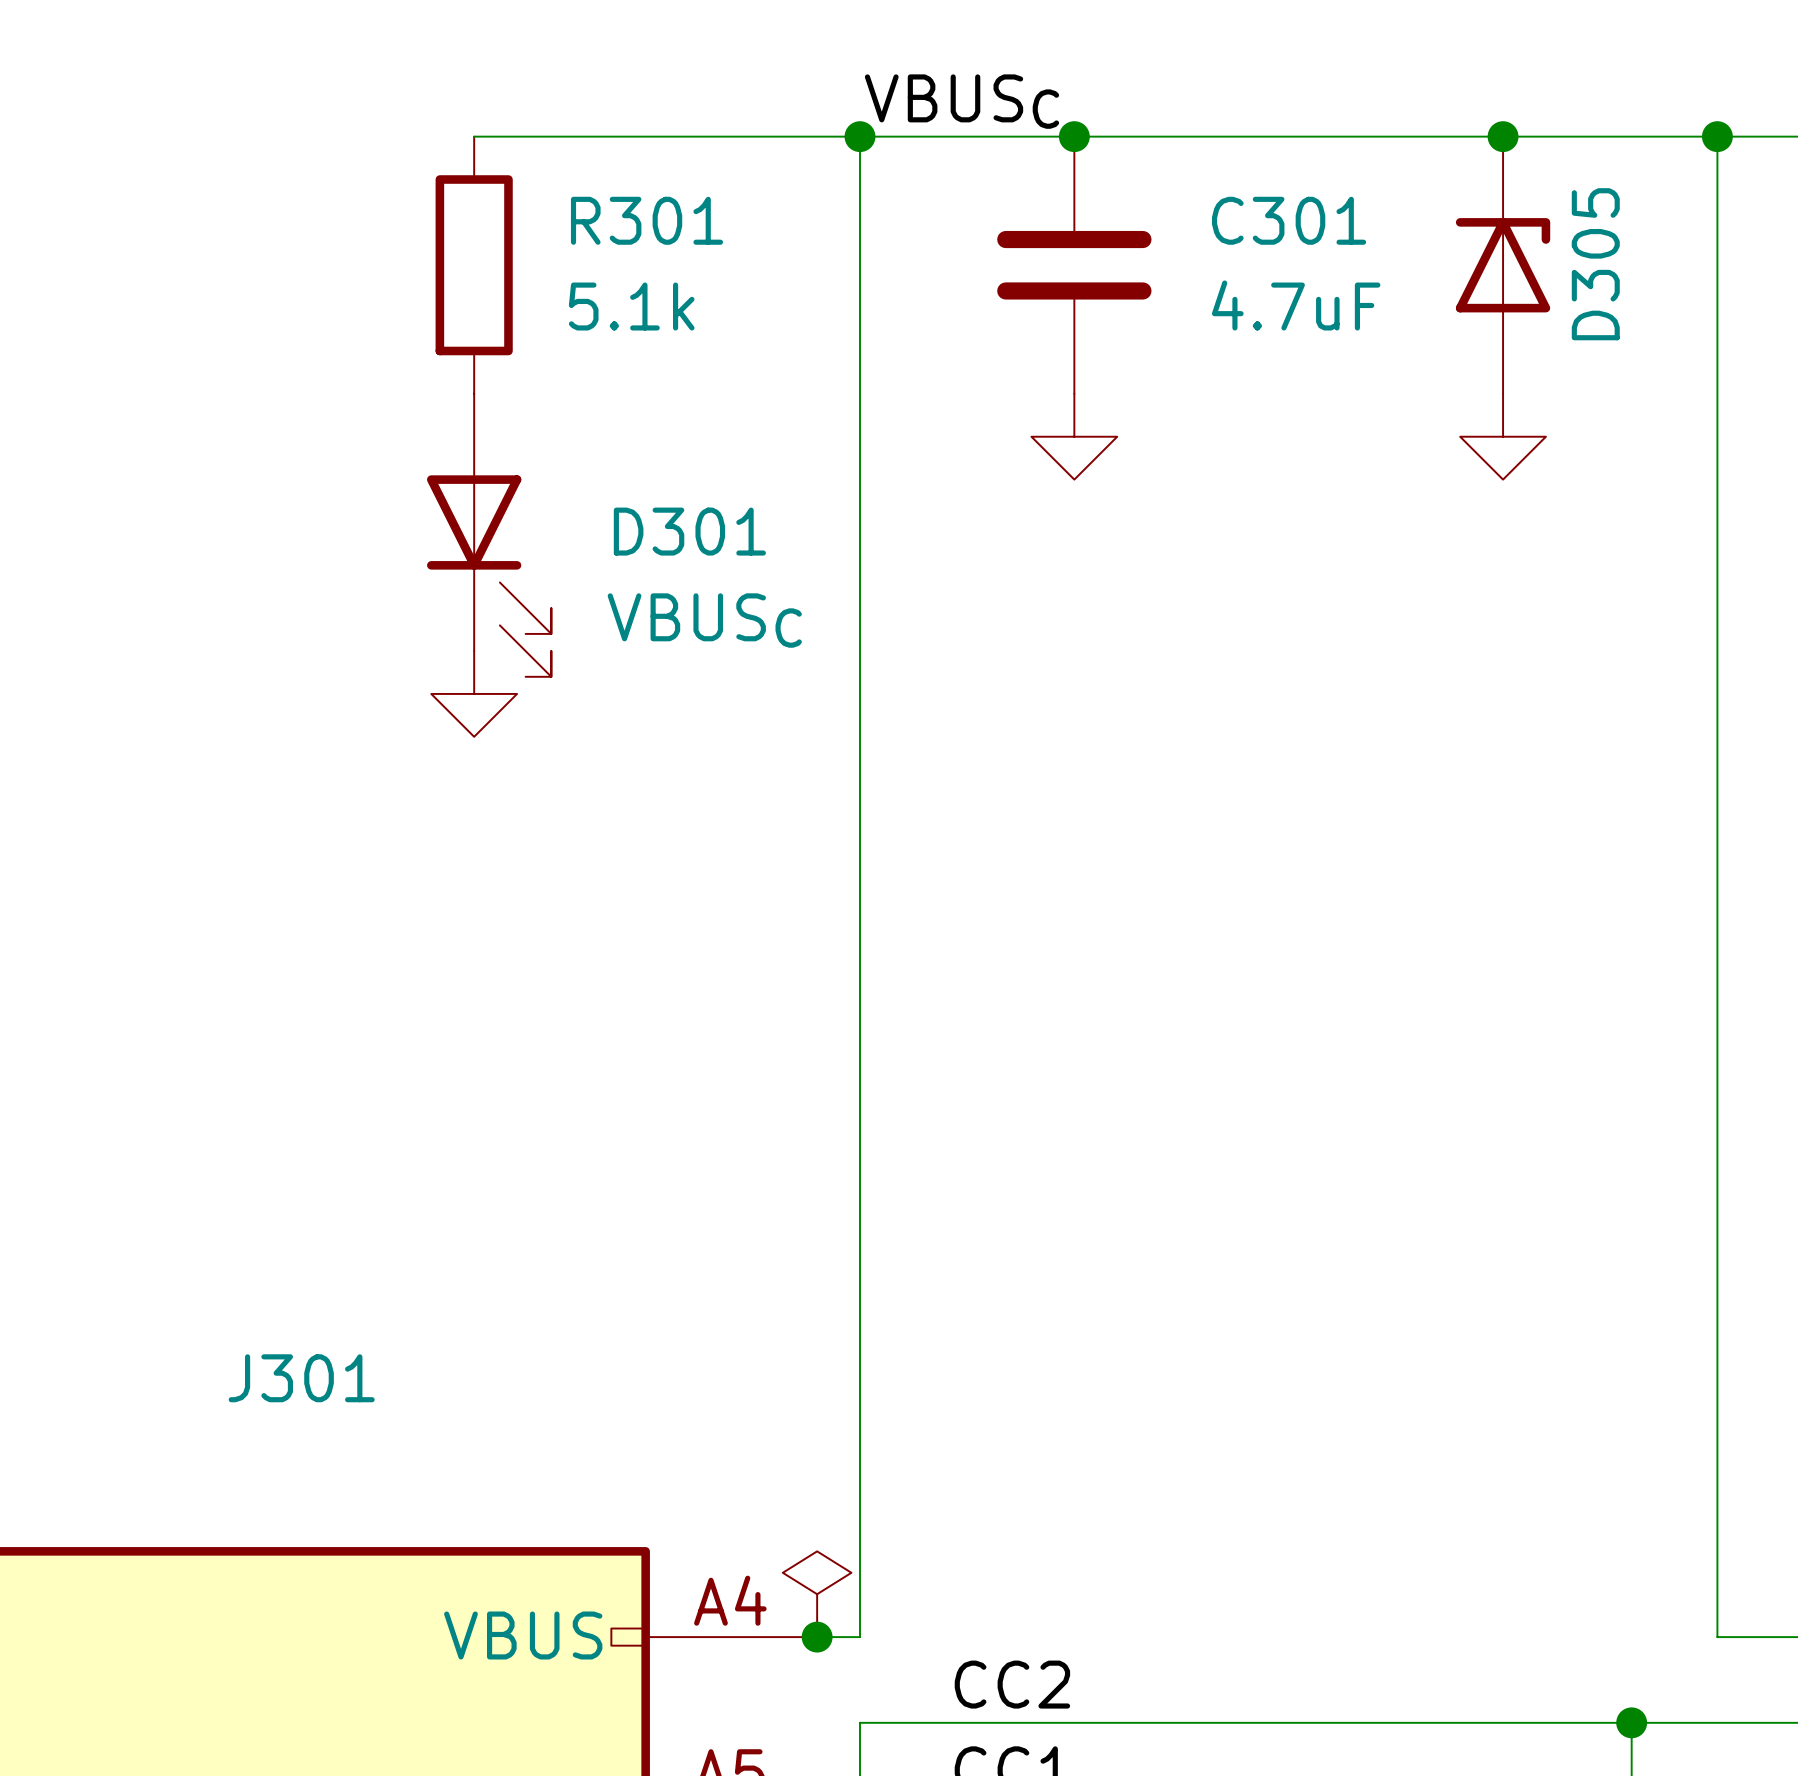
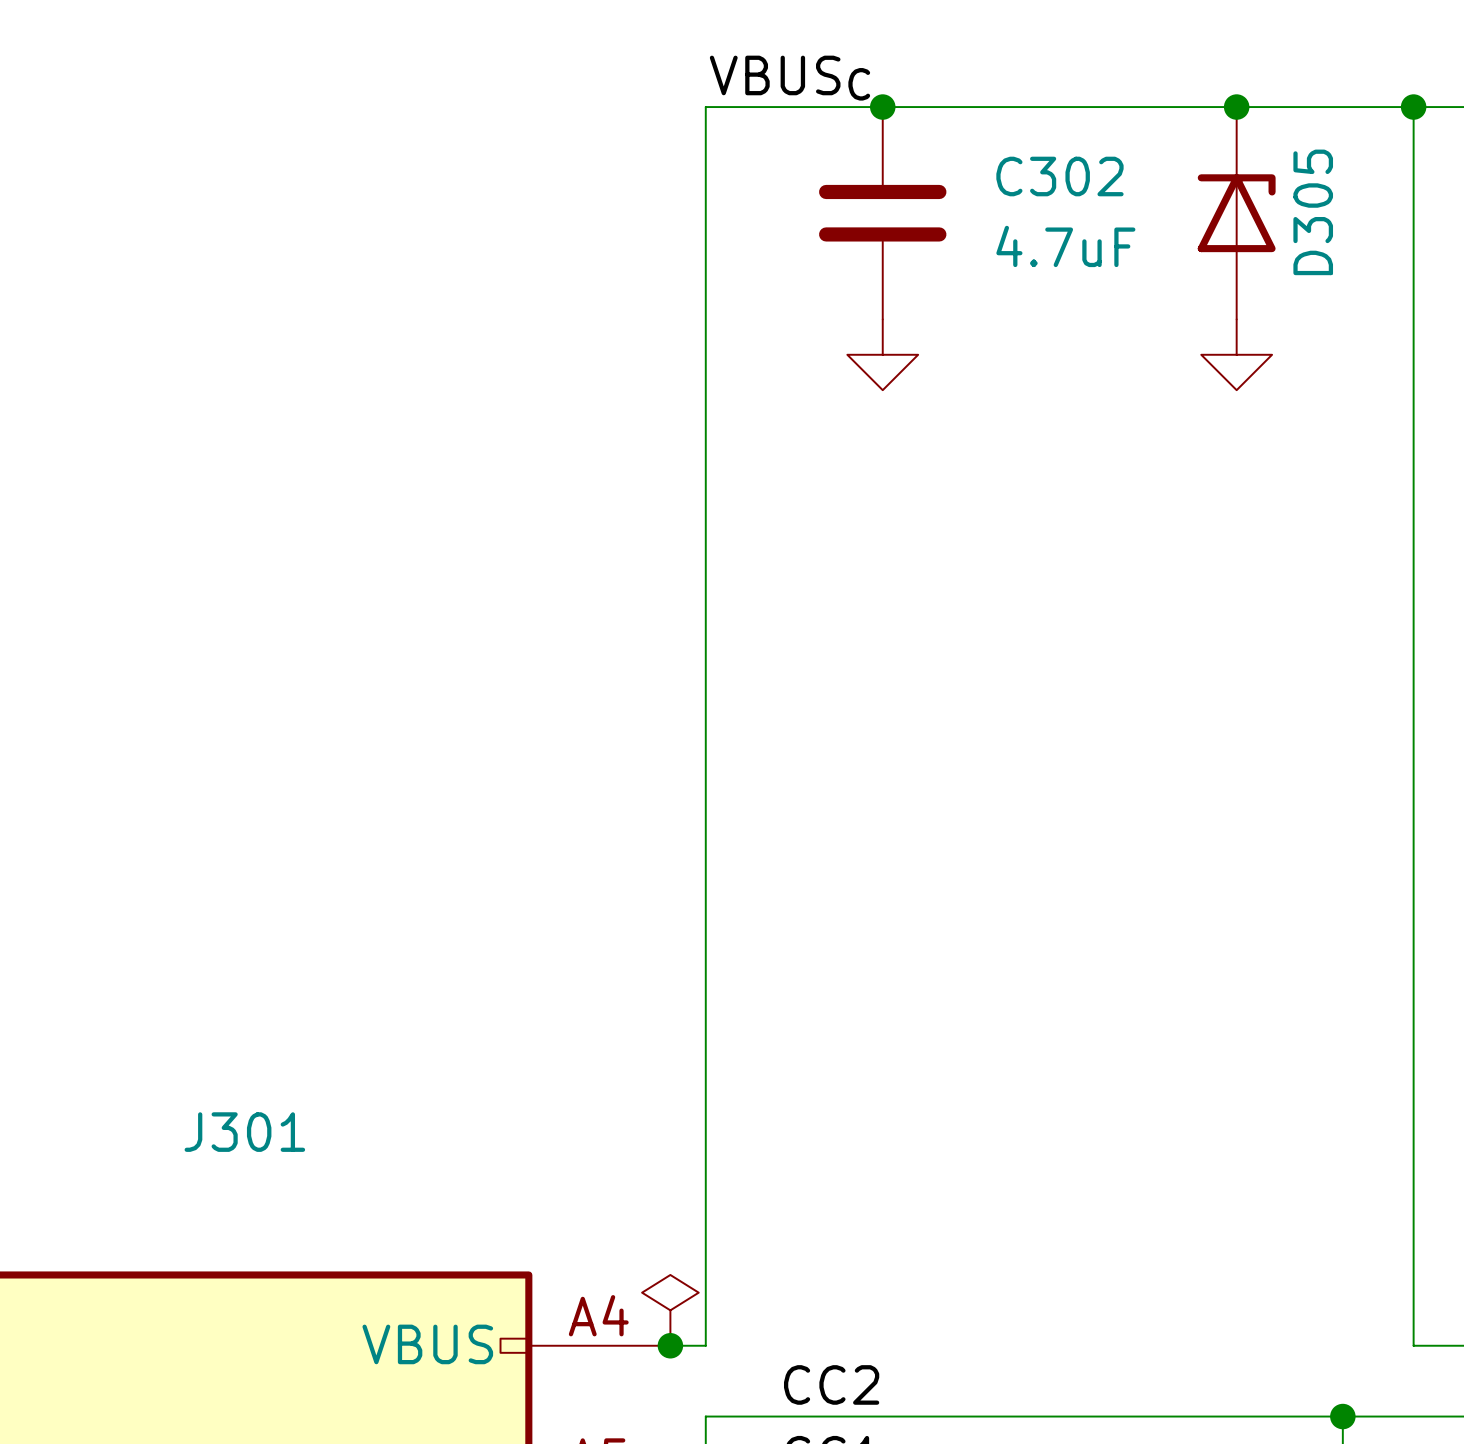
wire: (474, 136) (860, 136) -> none
junction: (860, 136) -> none
C301 name: C301 (1289, 220) -> C302 (1059, 176)
R301: 5.1k (474, 265) -> none
D301: VBUSC (489, 535) -> none
power symbol: (474, 693) -> none

